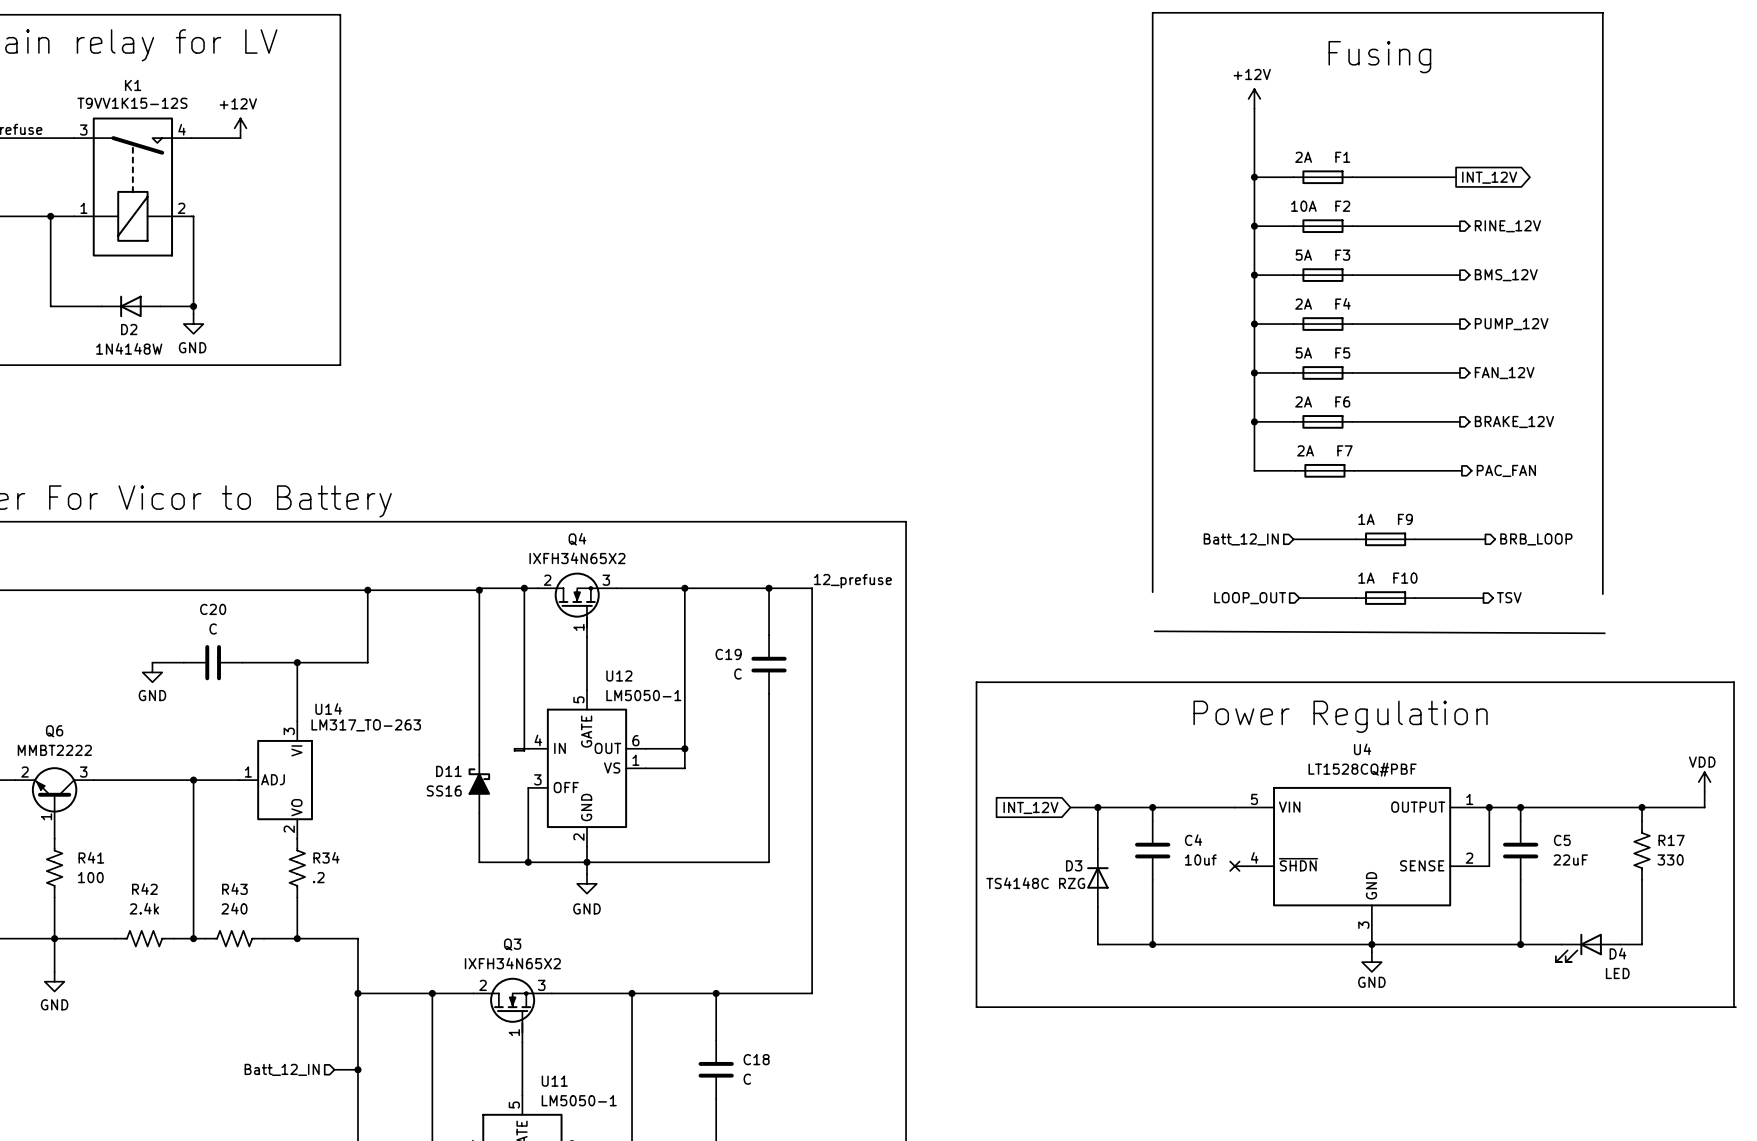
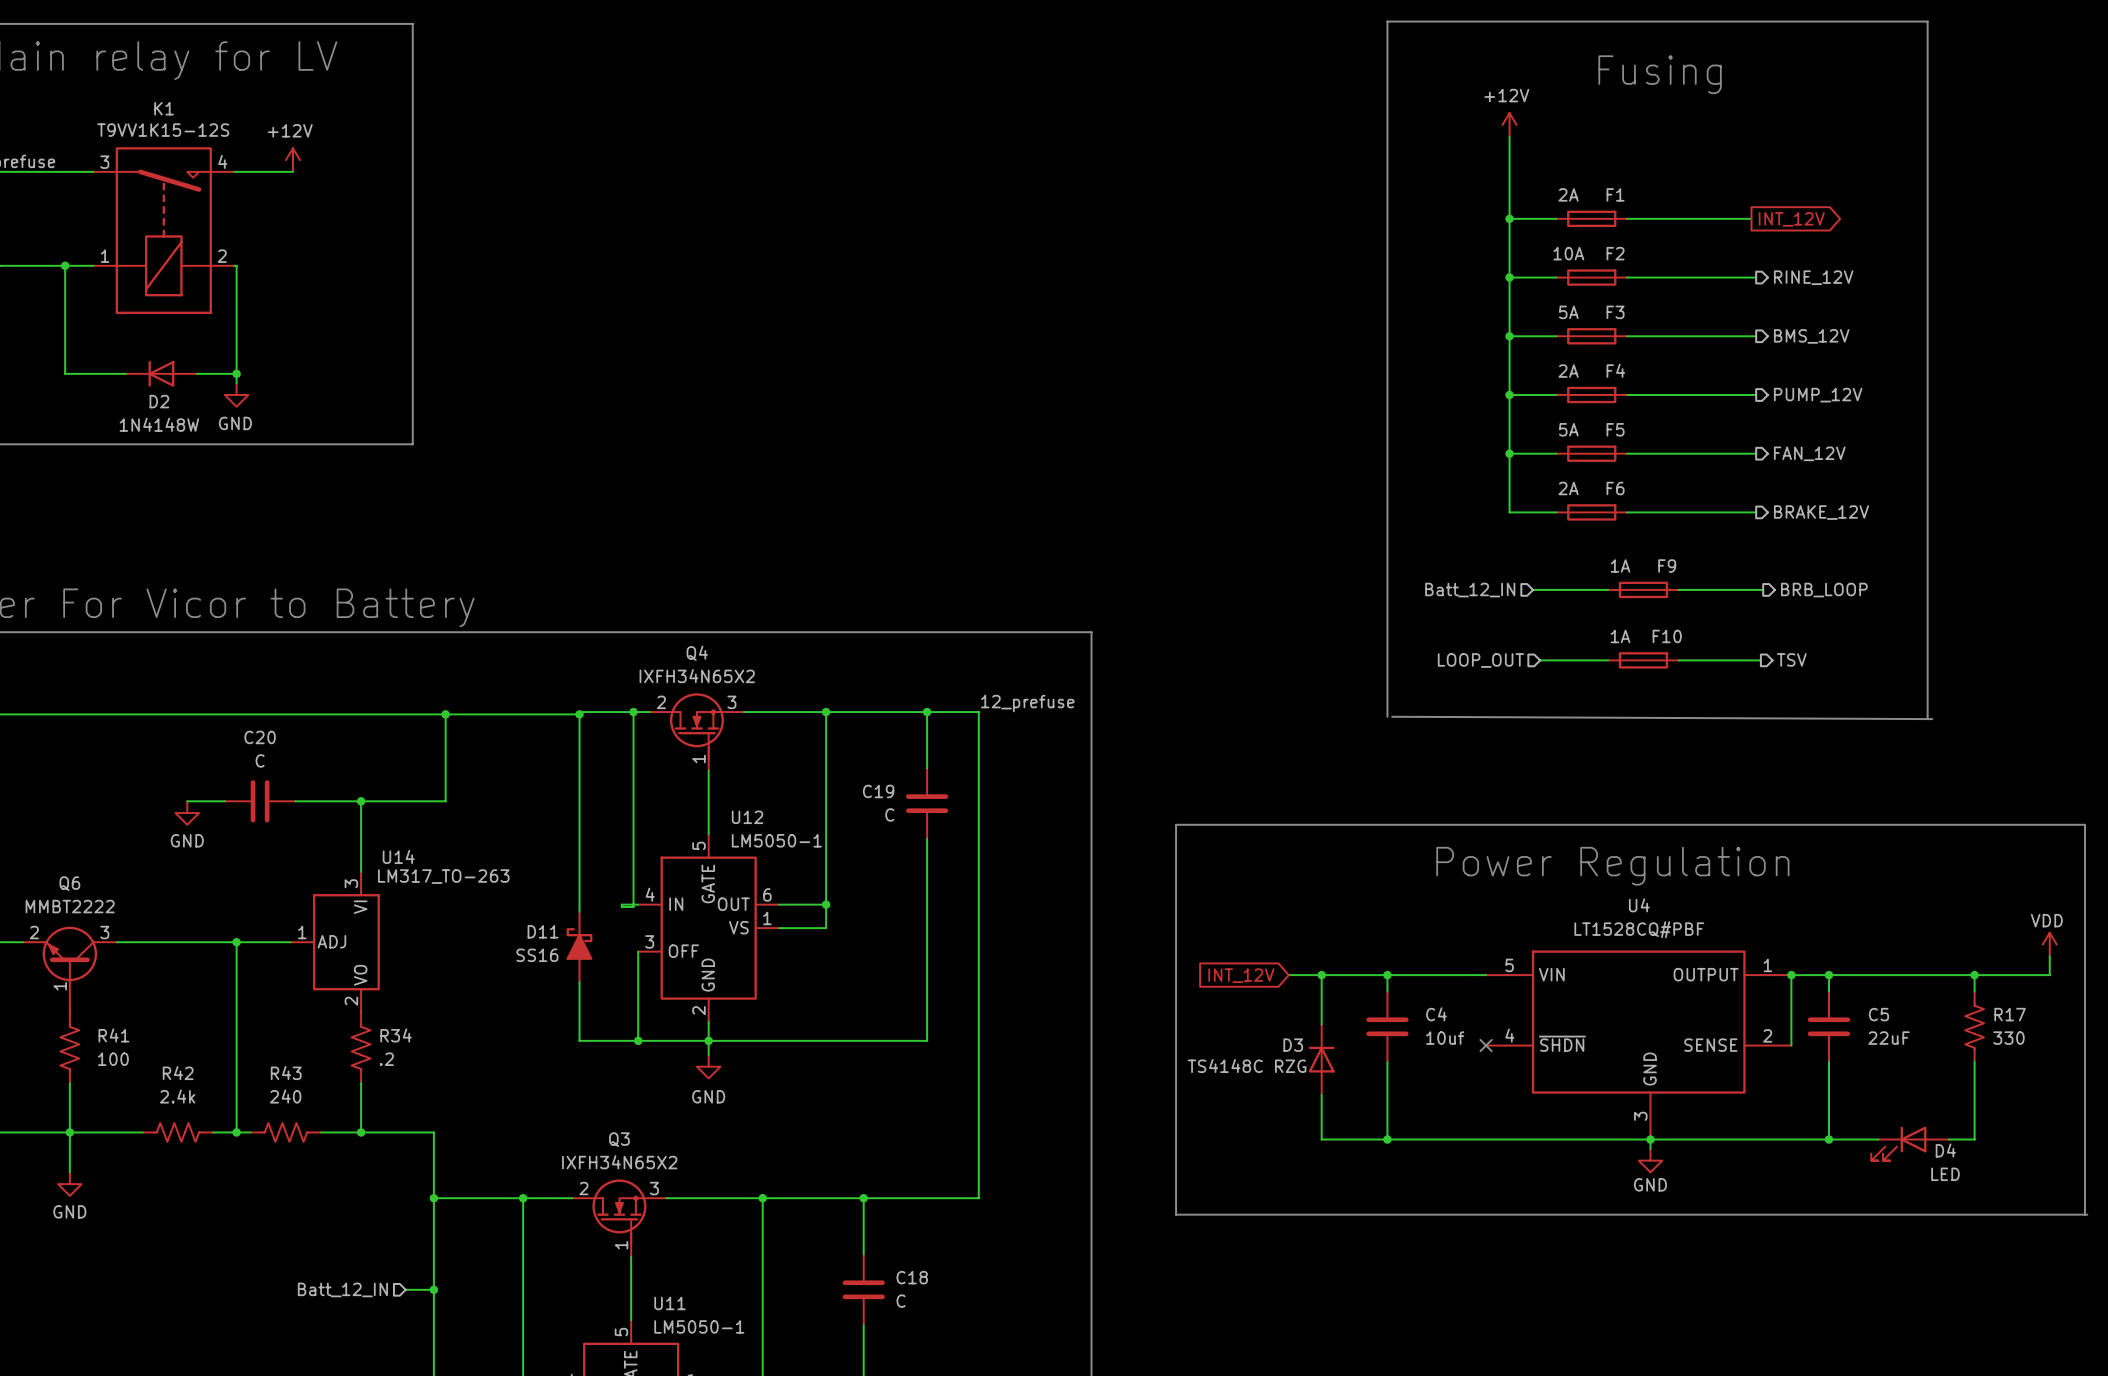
wire: (1254, 421) (1254, 470) (1295, 470) -> none
junction: (1254, 421) -> none
F7: 2A (1324, 470) -> none
wire: (1354, 470) (1461, 470) -> none
hierarchical label: PAC_FAN (1506, 470) -> none
hierarchical label position: Batt_12_IN (1241, 539) -> Batt_12_IN (1470, 590)
wire: (1293, 539) (1356, 539) -> (1533, 589) (1608, 589)
F9 position: (1385, 539) -> (1643, 589)
wire: (1414, 539) (1485, 539) -> (1678, 589) (1763, 589)
hierarchical label position: BRB_LOOP (1536, 539) -> BRB_LOOP (1824, 590)
hierarchical label position: TSV (1509, 597) -> TSV (1791, 659)
hierarchical label position: LOOP_OUT (1250, 598) -> LOOP_OUT (1480, 660)
wire: (1299, 598) (1356, 598) -> (1540, 660) (1608, 660)
F10 position: (1385, 598) -> (1643, 660)
wire: (1414, 598) (1483, 598) -> (1678, 660) (1760, 660)
line: (1154, 631) (1604, 633) -> (1392, 716) (1932, 719)

